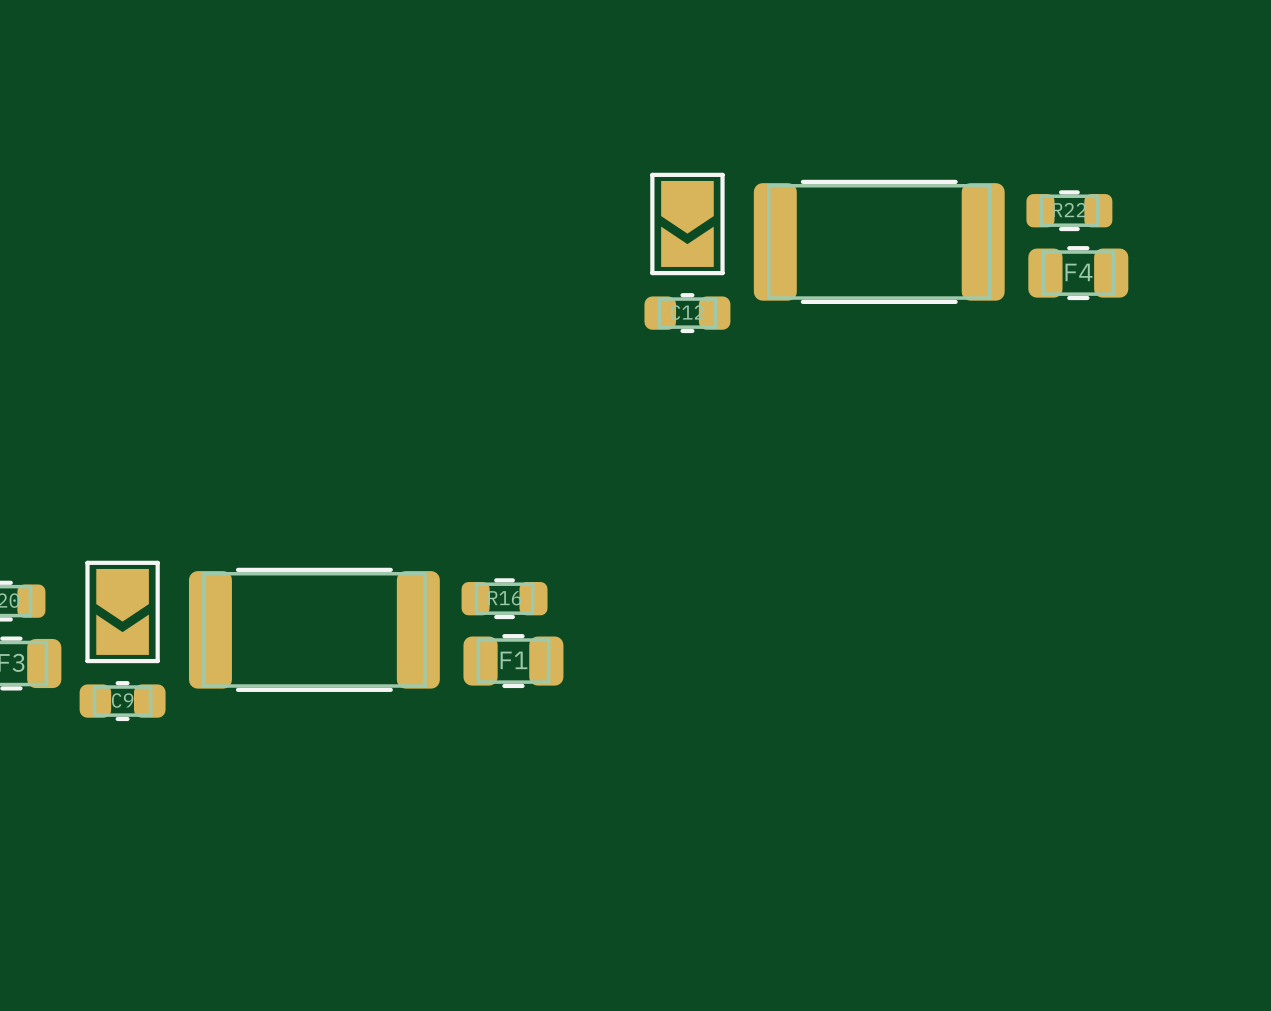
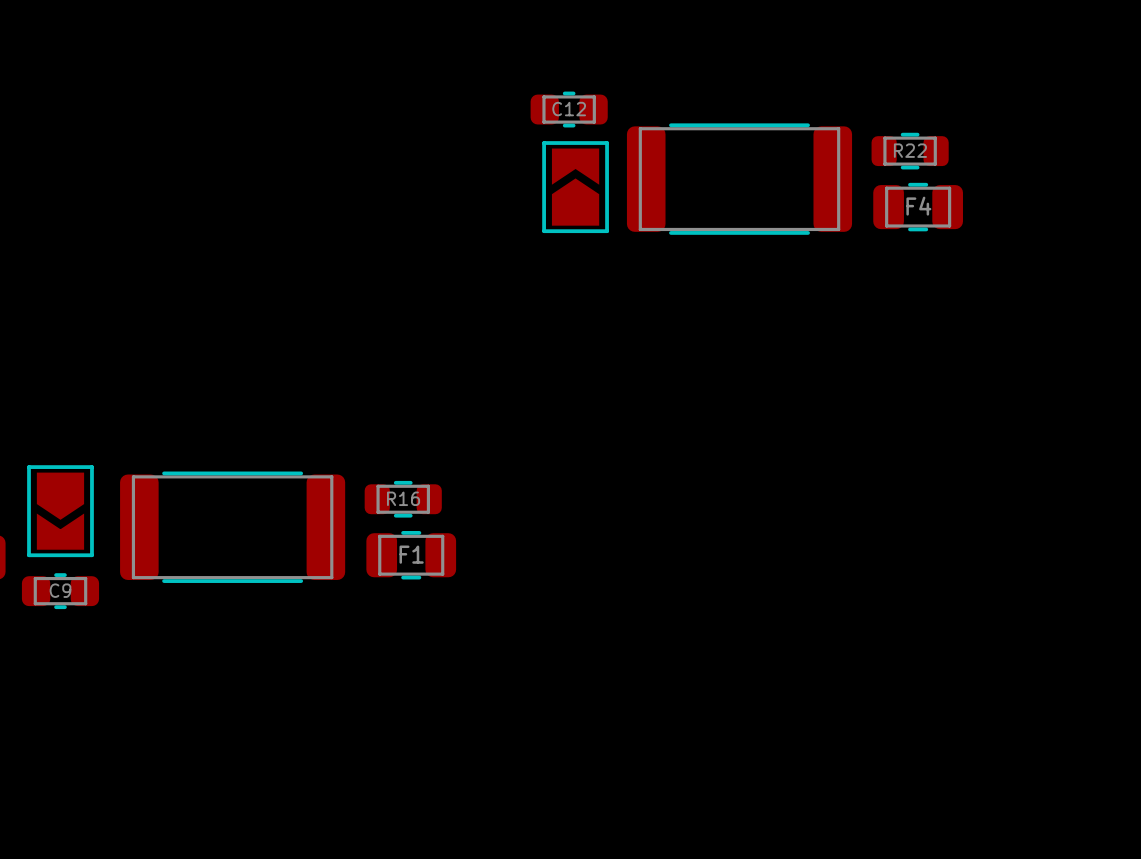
part rotation: 0° (687, 223) -> 180° (575, 187)
C12 position: (687, 313) -> (569, 109)

